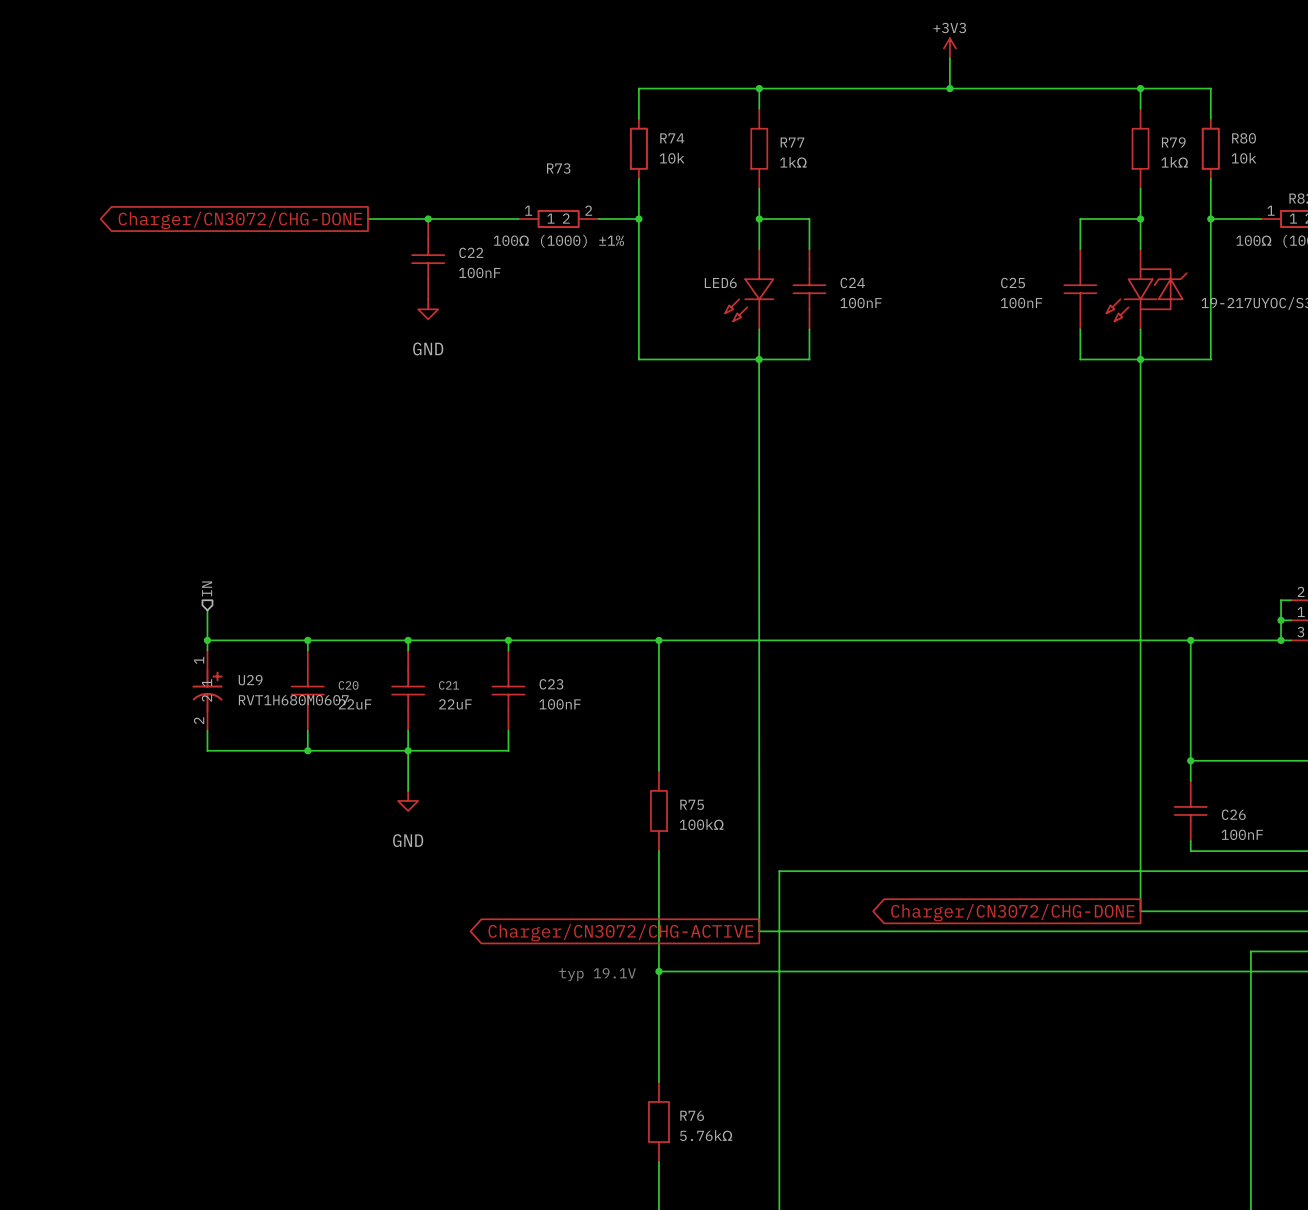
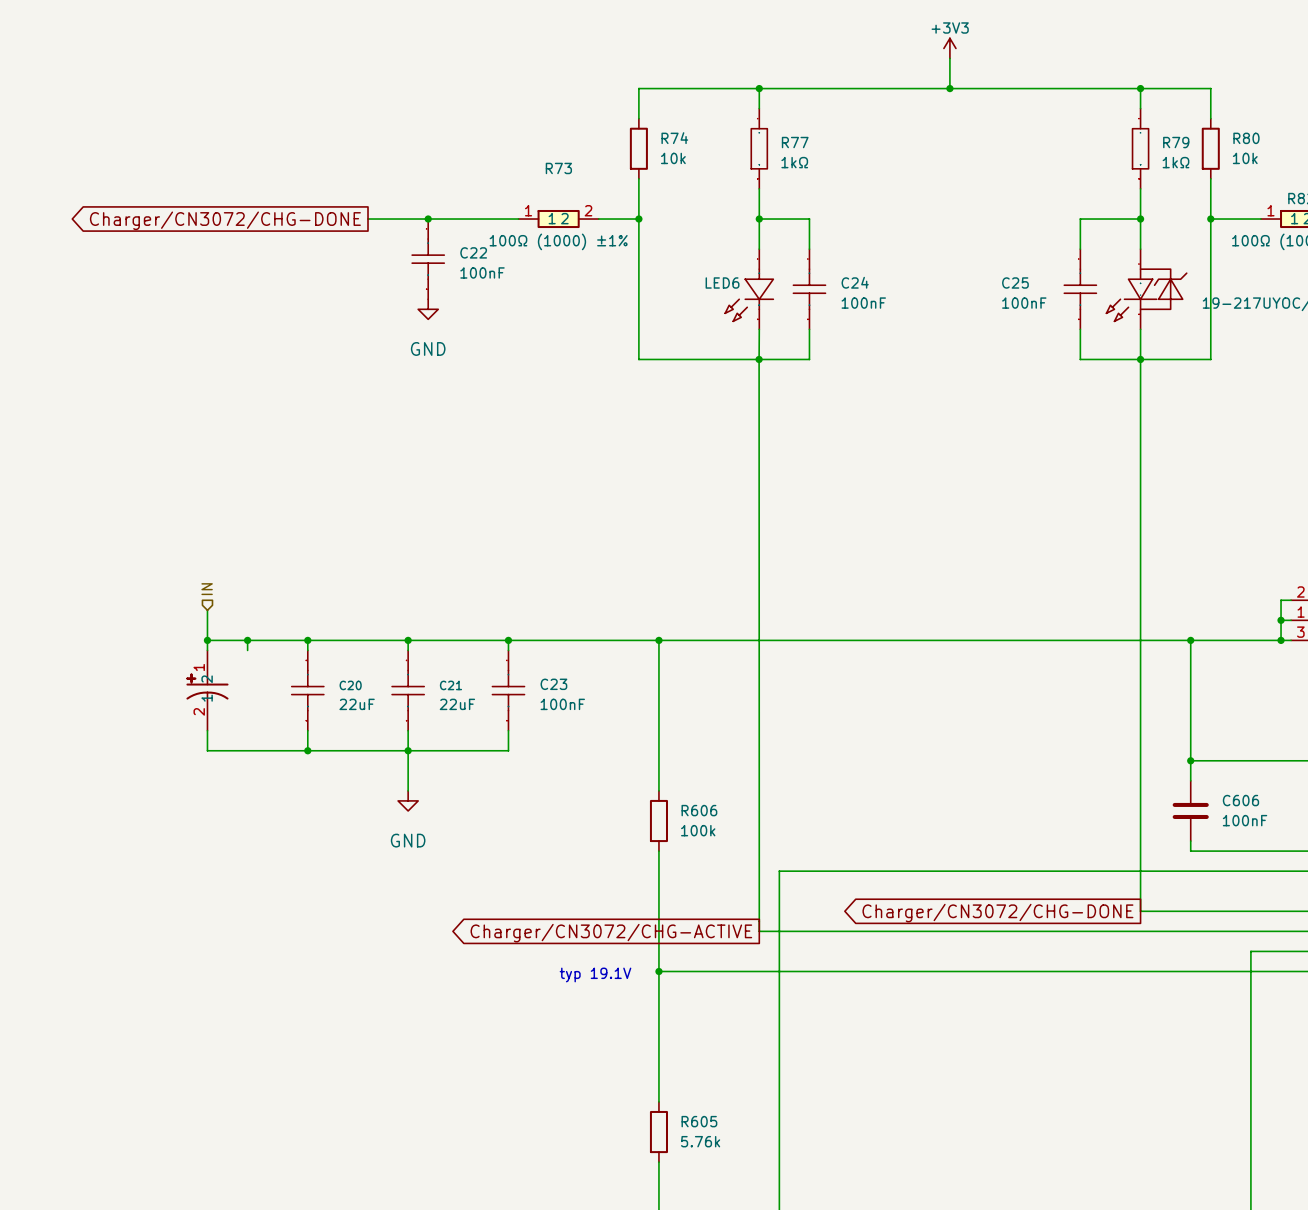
wire: none -> (247, 640) (247, 650)
junction: none -> (247, 640)
U29: RVT1H680M0607 (207, 690) -> none
part: none -> (207, 690)
R75: 100kΩ (658, 810) -> none
C26: 100nF (1190, 810) -> none
C606: none -> 100nF (1190, 810)
R606: none -> 100k (658, 821)
R76: 5.76kΩ (658, 1121) -> none
R605: none -> 5.76k (658, 1132)

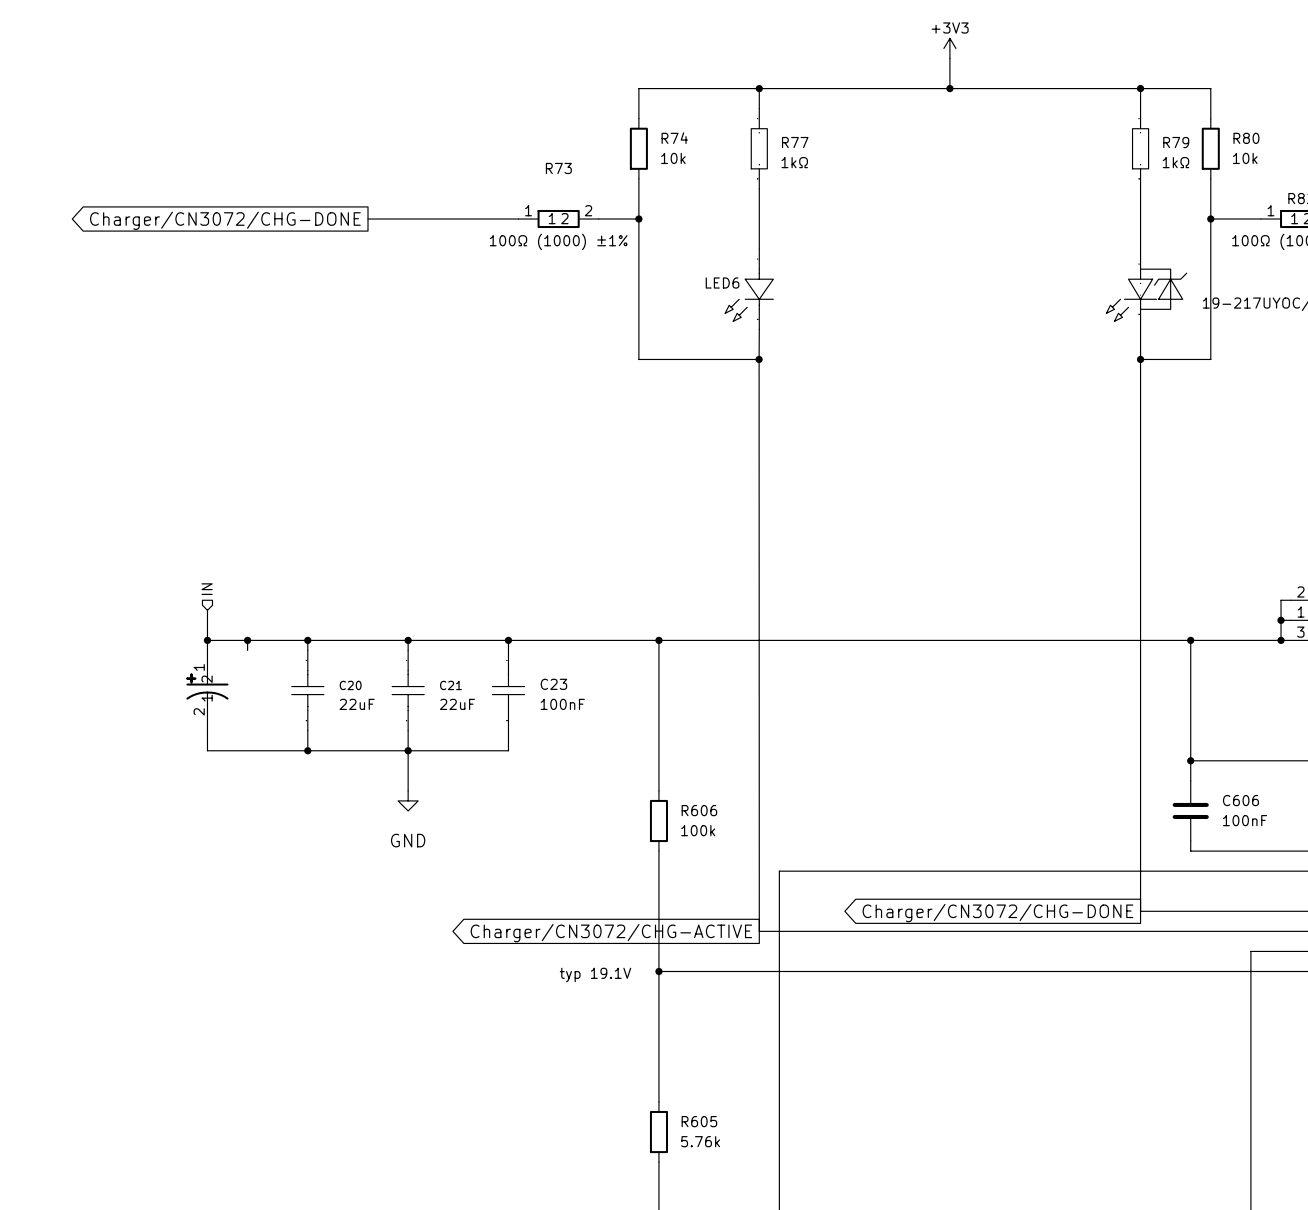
junction: (428, 219) -> none
wire: (759, 219) (809, 219) (809, 249) -> none
junction: (759, 219) -> none
wire: (1140, 219) (1080, 219) (1080, 249) -> none
junction: (1140, 219) -> none
C22: 100nF (428, 259) -> none
C24: 100nF (809, 289) -> none
C25: 100nF (1080, 289) -> none
power symbol: GND (428, 309) -> none
wire: (809, 329) (809, 359) (759, 359) -> none
wire: (1080, 329) (1080, 359) (1140, 359) -> none

